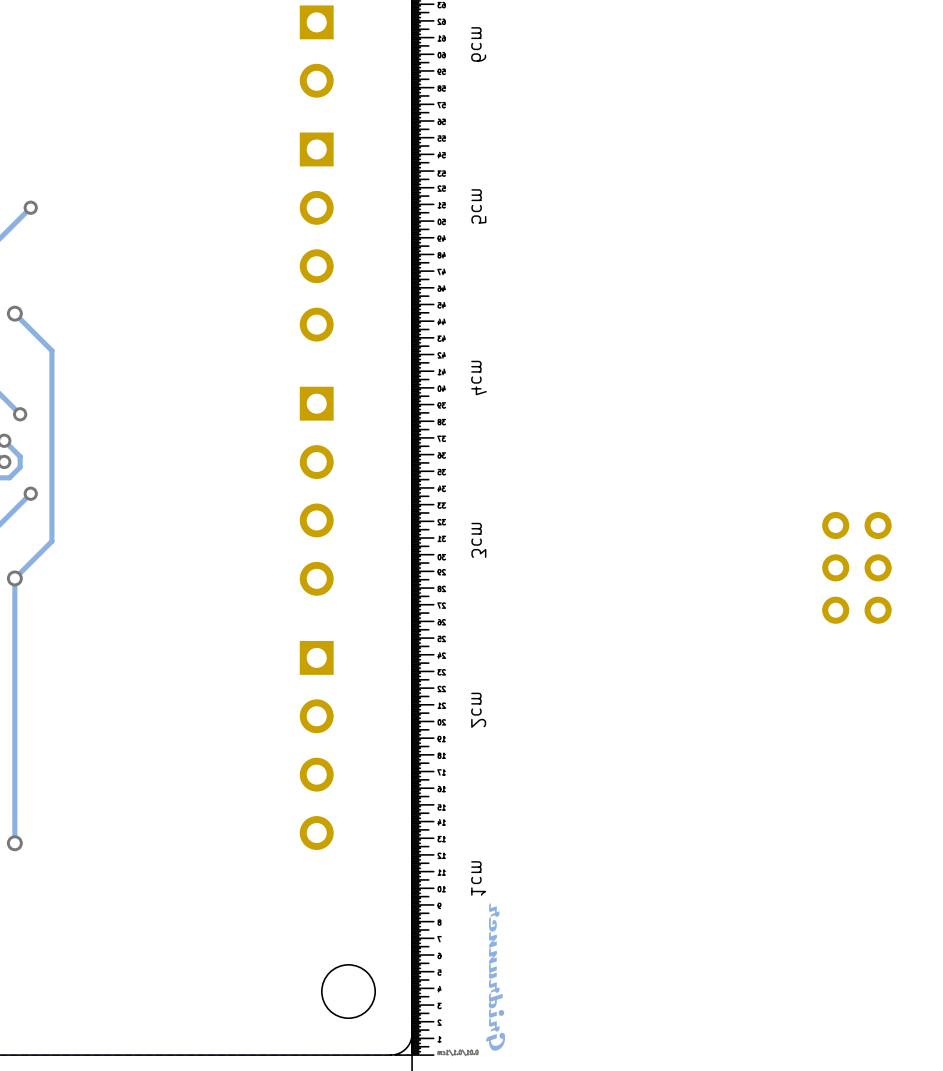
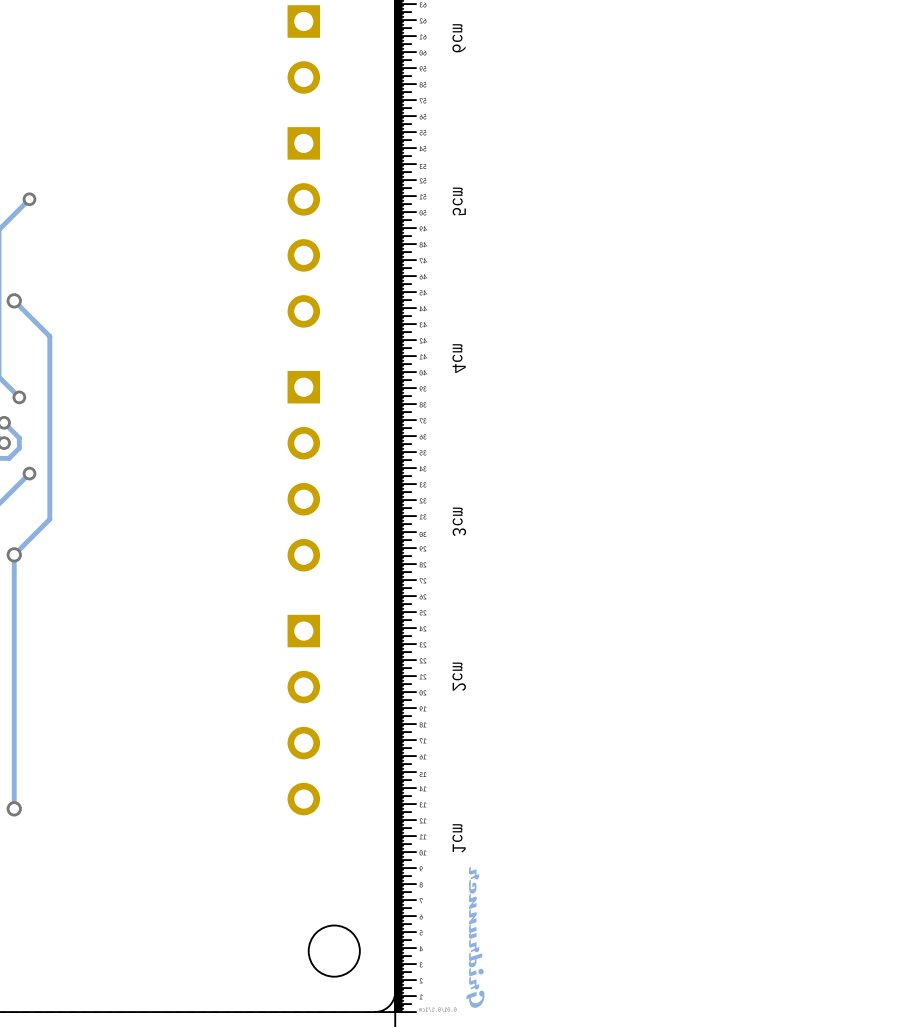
part: (856, 567) -> none

